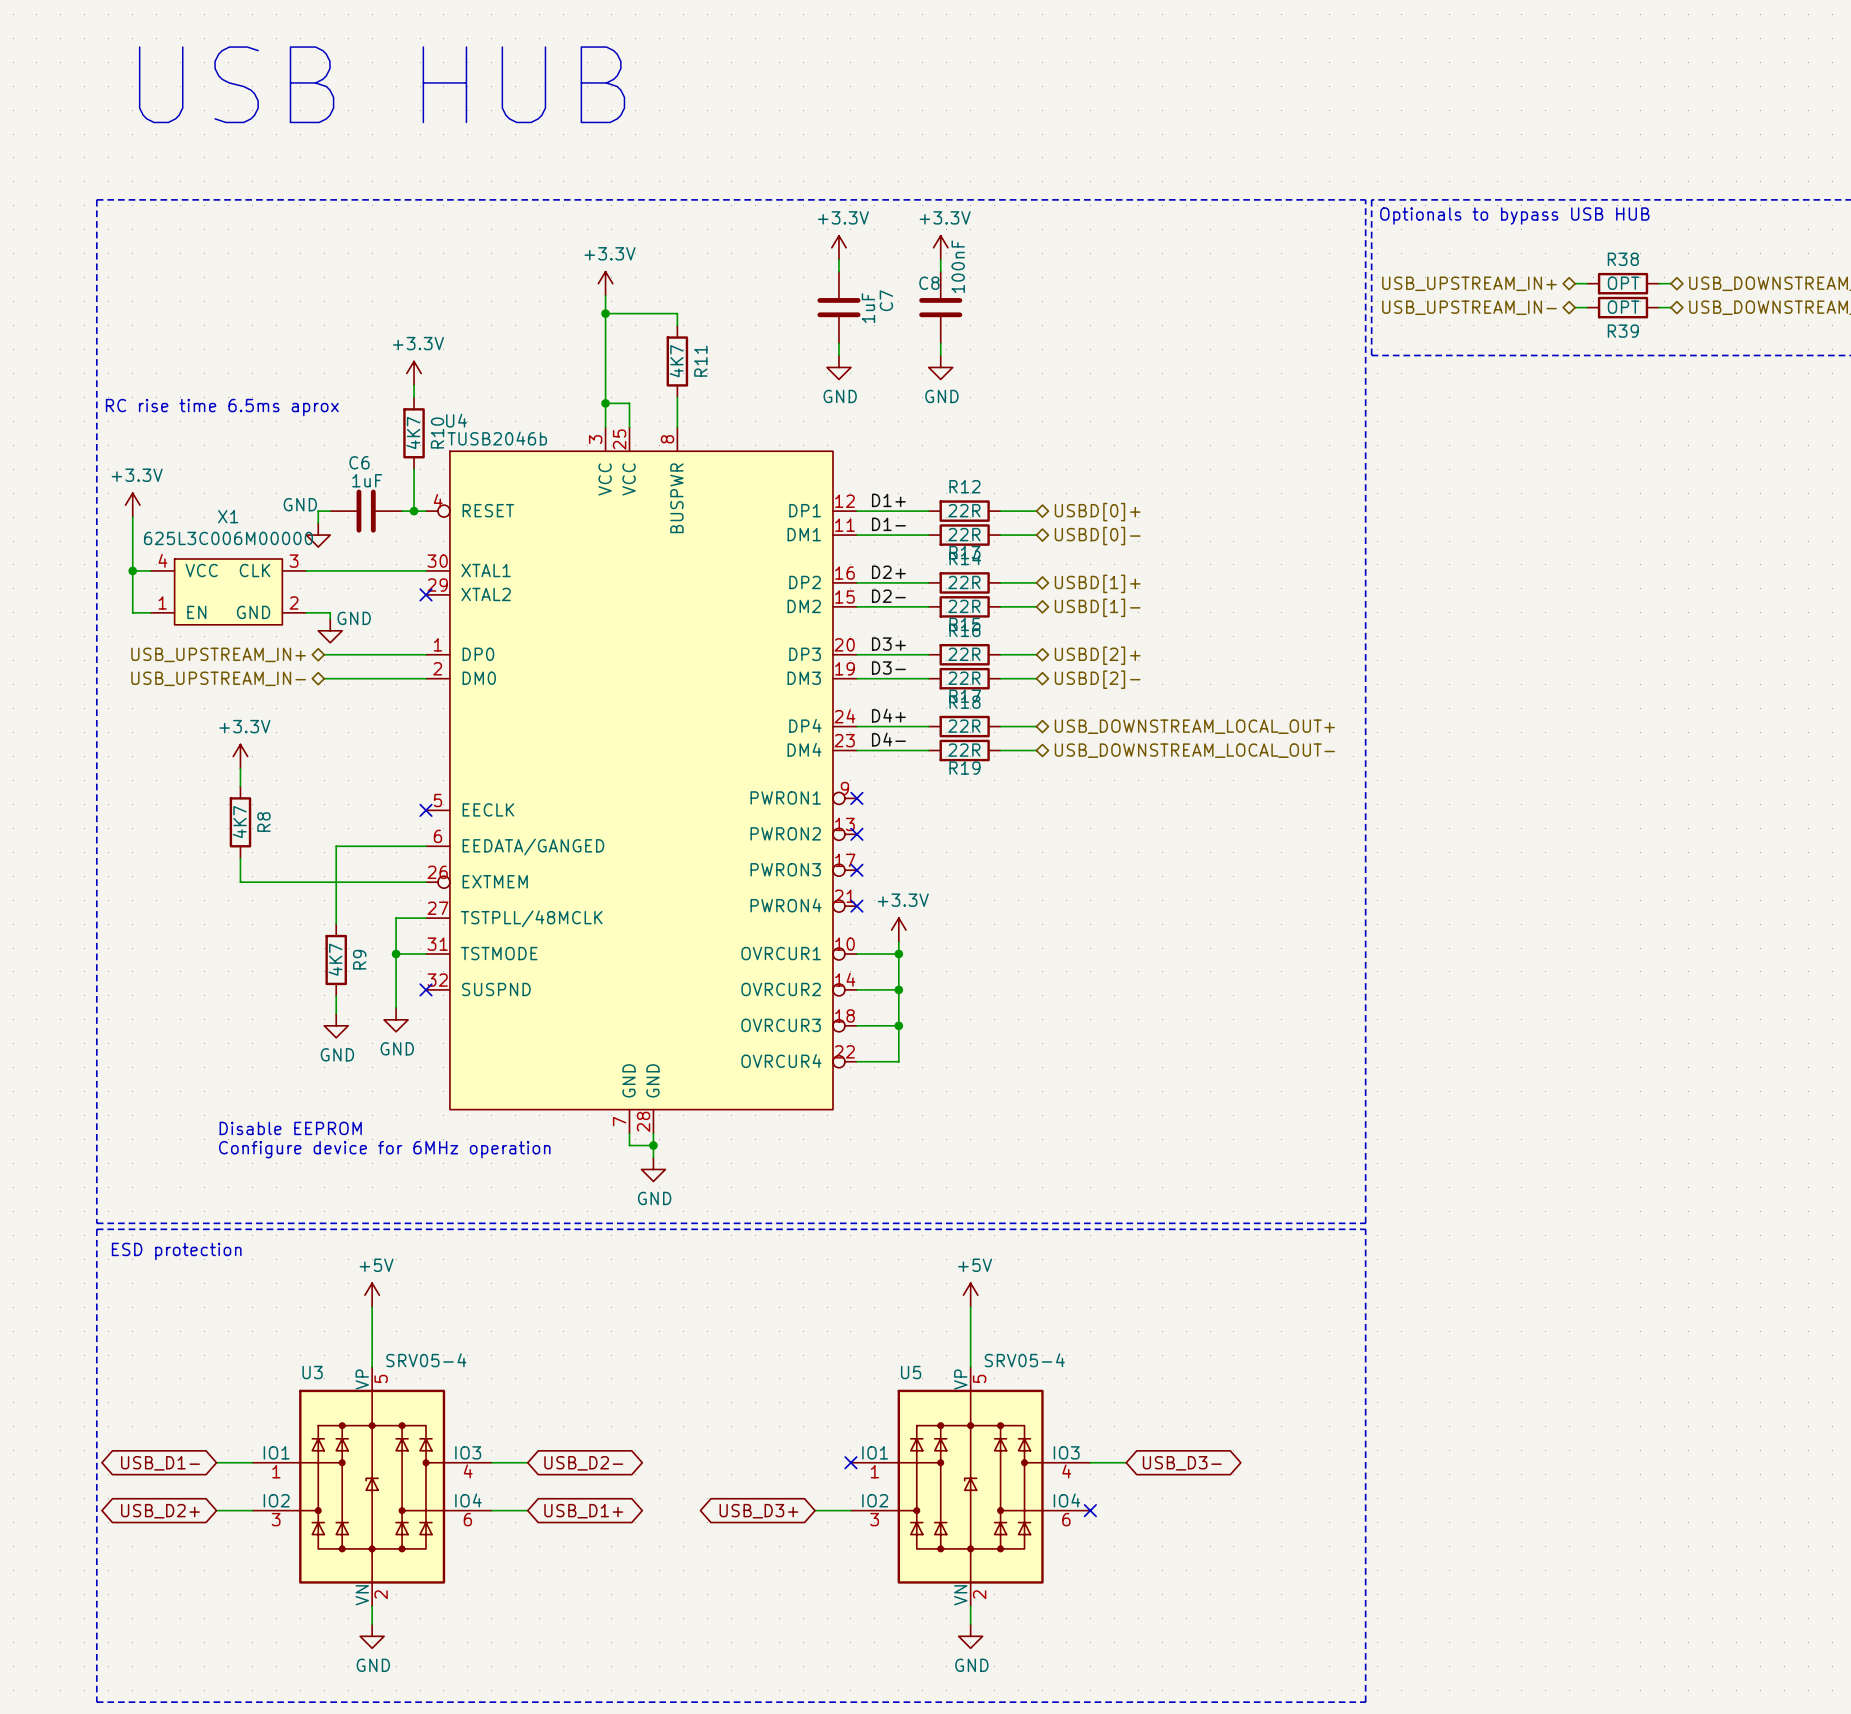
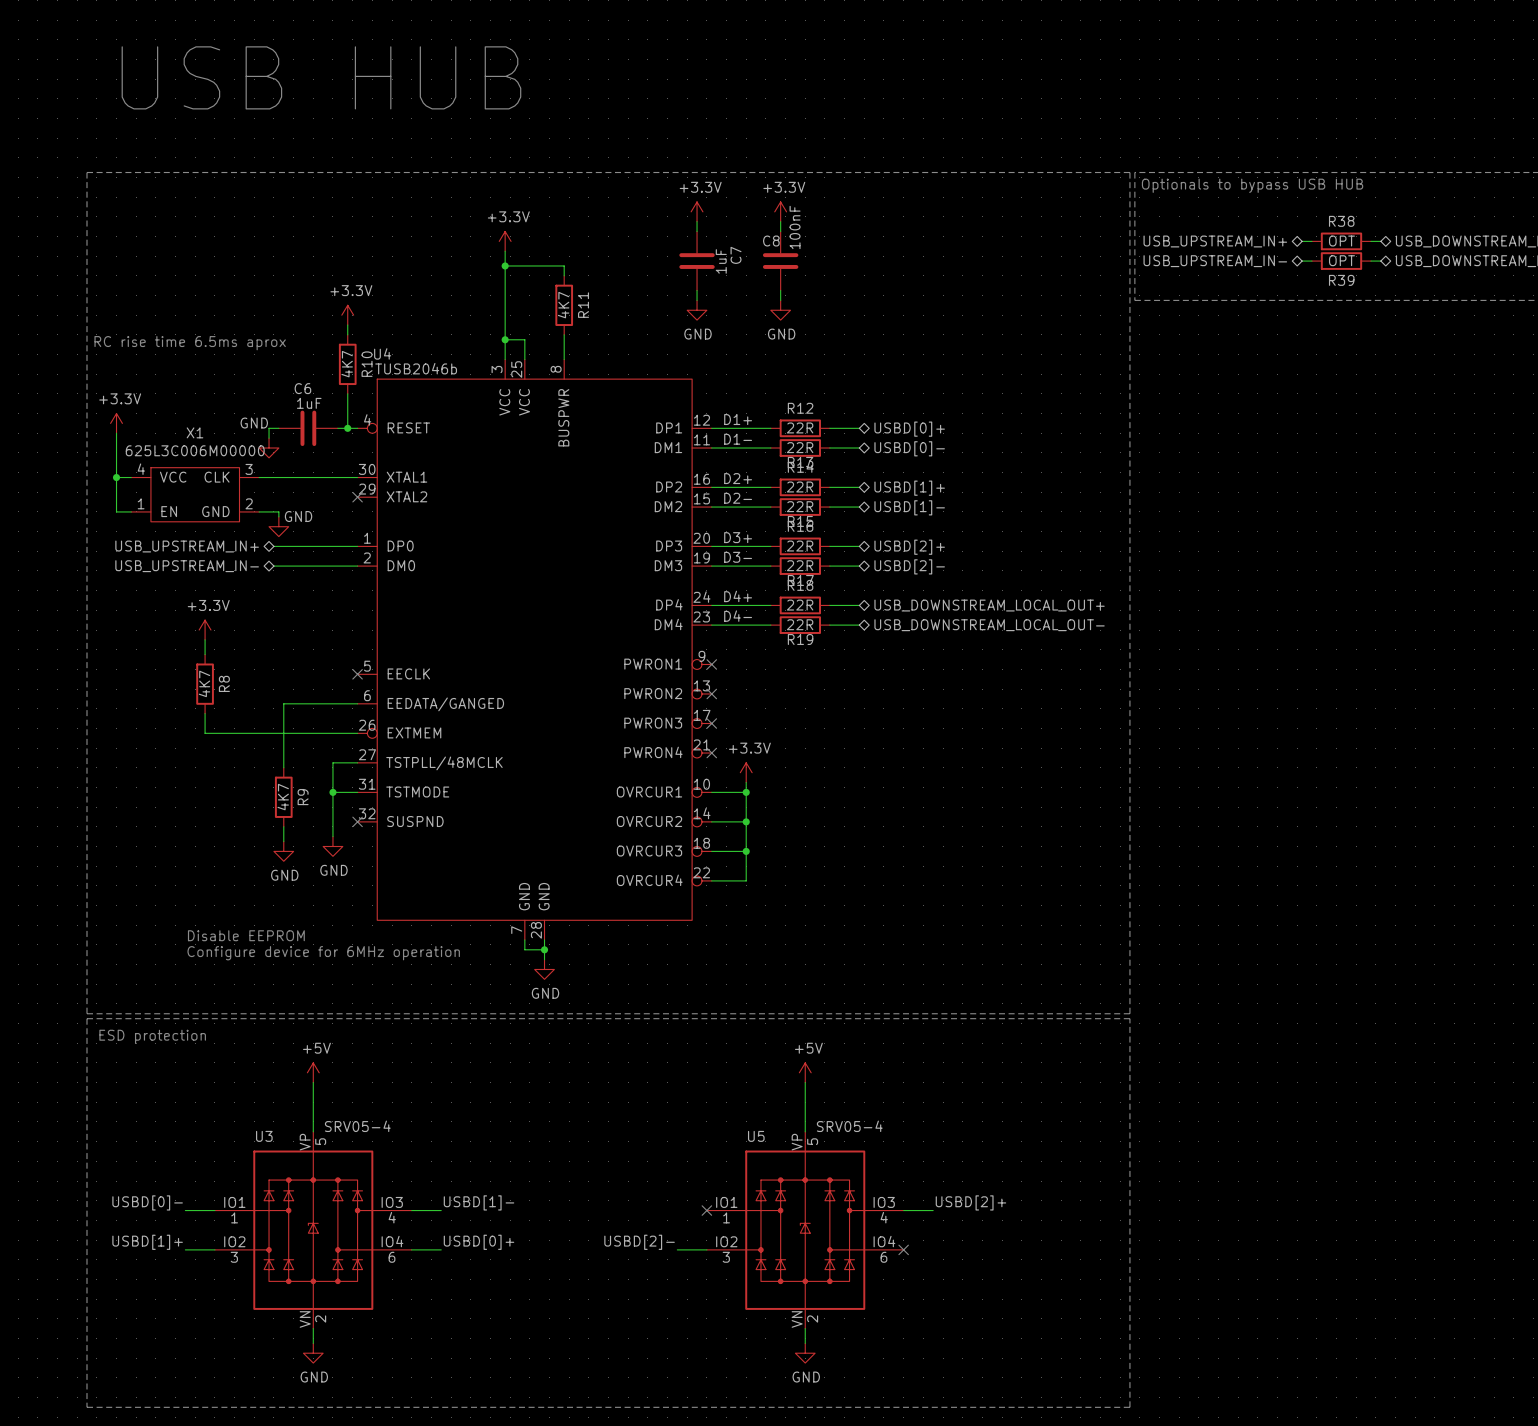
label: none -> USBD[0]- (147, 1202)
label: none -> USBD[1]- (478, 1202)
label: none -> USBD[2]+ (970, 1202)
global label: USB_D1- (160, 1463) -> none
global label: USB_D2- (583, 1463) -> none
global label: USB_D3- (1182, 1463) -> none
label: none -> USBD[1]+ (147, 1242)
label: none -> USBD[0]+ (478, 1242)
label: none -> USBD[2]- (639, 1242)
global label: USB_D2+ (160, 1511) -> none
global label: USB_D1+ (583, 1511) -> none
global label: USB_D3+ (759, 1511) -> none

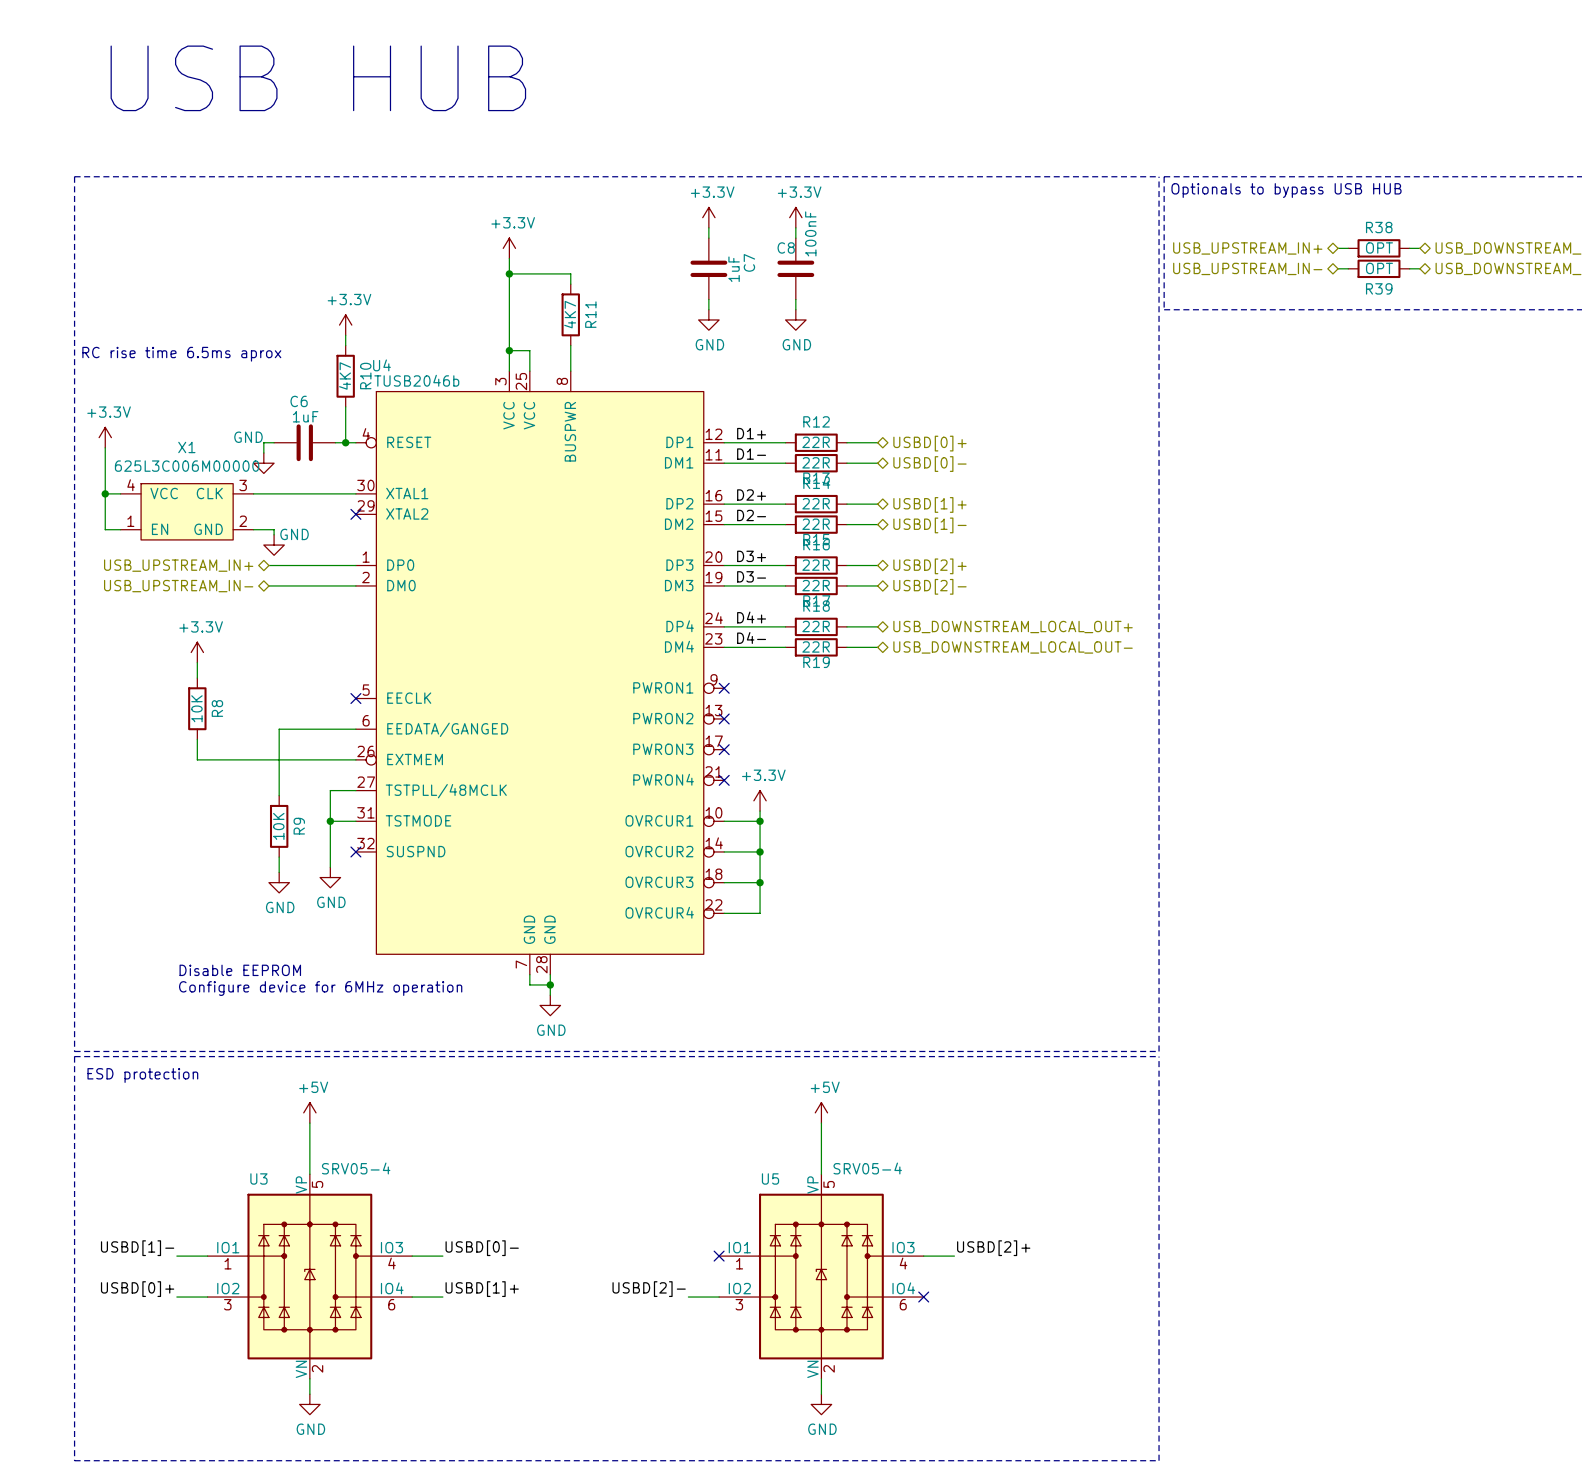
R8 value: 4K7 (204, 683) -> 10K (196, 708)
R9 value: 4K7 (283, 797) -> 10K (278, 826)
label: USBD[0]- (147, 1202) -> USBD[1]- (137, 1248)
label: USBD[1]- (478, 1202) -> USBD[0]- (482, 1248)
label: USBD[1]+ (147, 1242) -> USBD[0]+ (137, 1289)
label: USBD[0]+ (478, 1242) -> USBD[1]+ (482, 1289)

